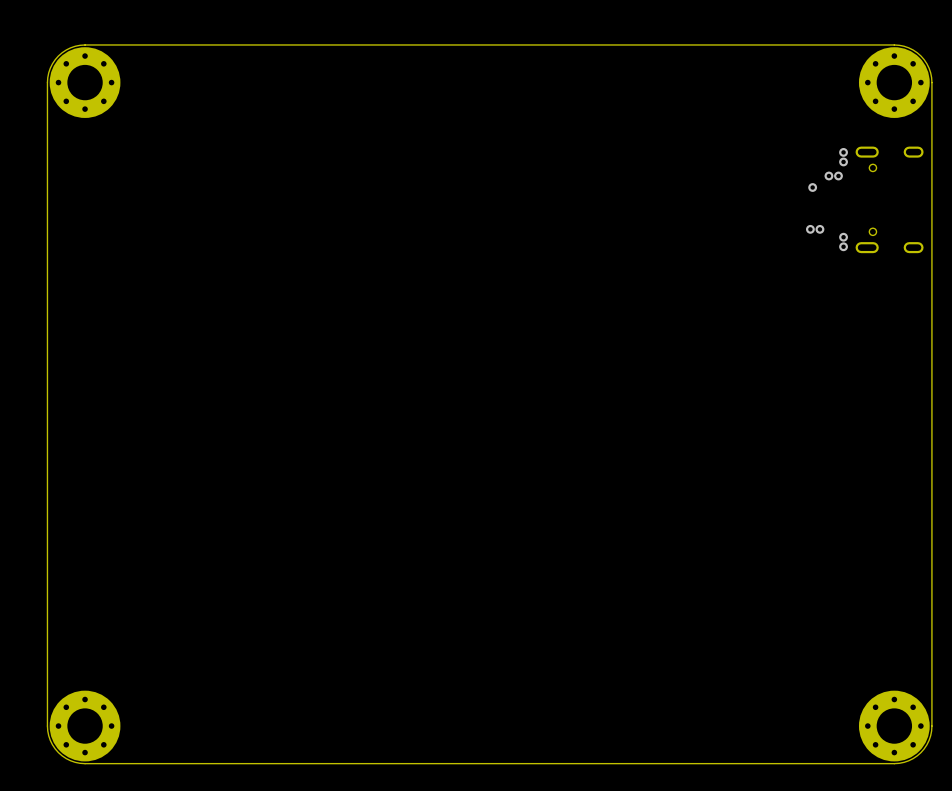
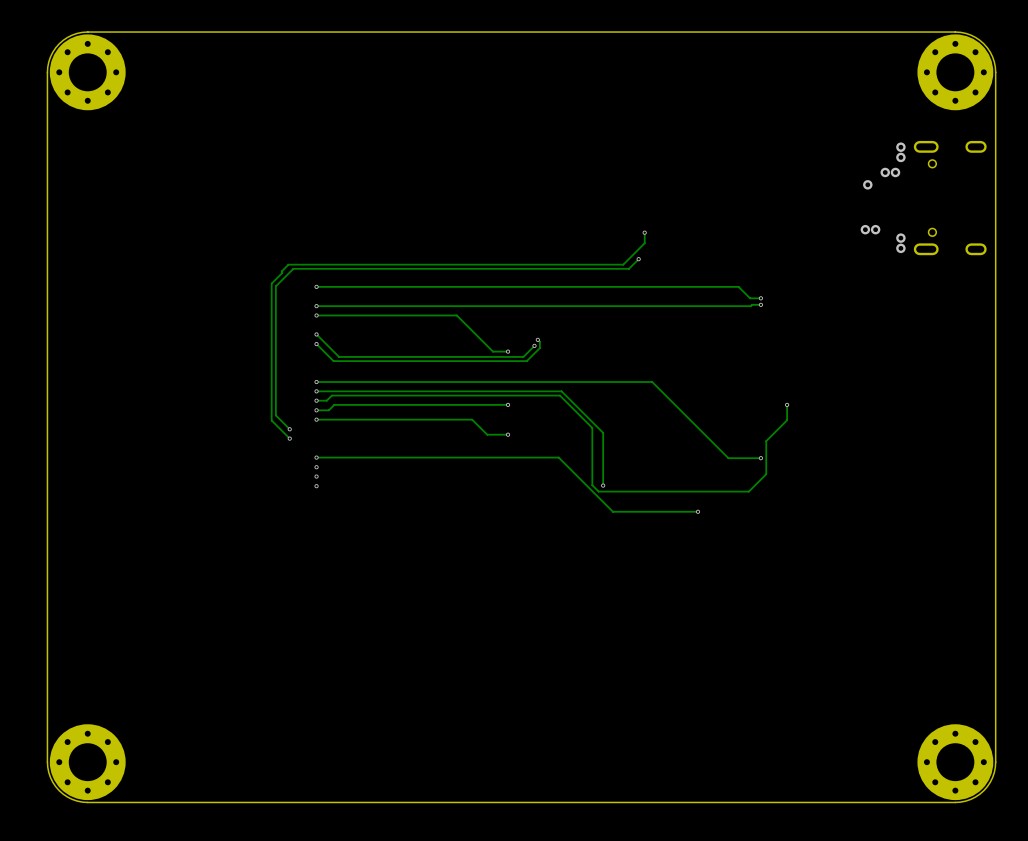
track: none -> (644, 232) (644, 243) (623, 264) (288, 264) (271, 283) (271, 420) (289, 438)
via: none -> (644, 232)
track: none -> (638, 259) (629, 268) (293, 268) (275, 286) (275, 415) (289, 429)
via: none -> (638, 259)
track: none -> (316, 286) (738, 286) (750, 298) (760, 298)
via: none -> (316, 286)
via: none -> (760, 298)
track: none -> (760, 304) (316, 306)
via: none -> (760, 304)
via: none -> (316, 306)
track: none -> (316, 315) (456, 315) (492, 351) (508, 351)
via: none -> (316, 315)
track: none -> (316, 334) (339, 356) (523, 356) (534, 345)
via: none -> (316, 334)
track: none -> (537, 339) (539, 348) (526, 361) (333, 361) (316, 344)
via: none -> (537, 339)
via: none -> (316, 344)
via: none -> (534, 345)
via: none -> (508, 351)
track: none -> (316, 382) (652, 382) (728, 458) (760, 458)
via: none -> (316, 382)
track: none -> (316, 391) (561, 391) (603, 432) (603, 485)
via: none -> (316, 391)
track: none -> (316, 400) (326, 400) (331, 395) (559, 395) (592, 427) (592, 485) (598, 491) (748, 491) (766, 474) (766, 441) (787, 420) (787, 404)
via: none -> (316, 400)
track: none -> (508, 404) (334, 404) (328, 410) (316, 410)
via: none -> (508, 404)
via: none -> (787, 404)
via: none -> (316, 410)
track: none -> (316, 419) (472, 419) (487, 434) (508, 434)
via: none -> (316, 419)
via: none -> (289, 429)
via: none -> (508, 434)
via: none -> (289, 438)
track: none -> (316, 457) (558, 457) (612, 511) (697, 511)
via: none -> (316, 457)
via: none -> (760, 458)
via: none -> (316, 467)
via: none -> (316, 476)
via: none -> (316, 486)
via: none -> (603, 485)
via: none -> (697, 511)

